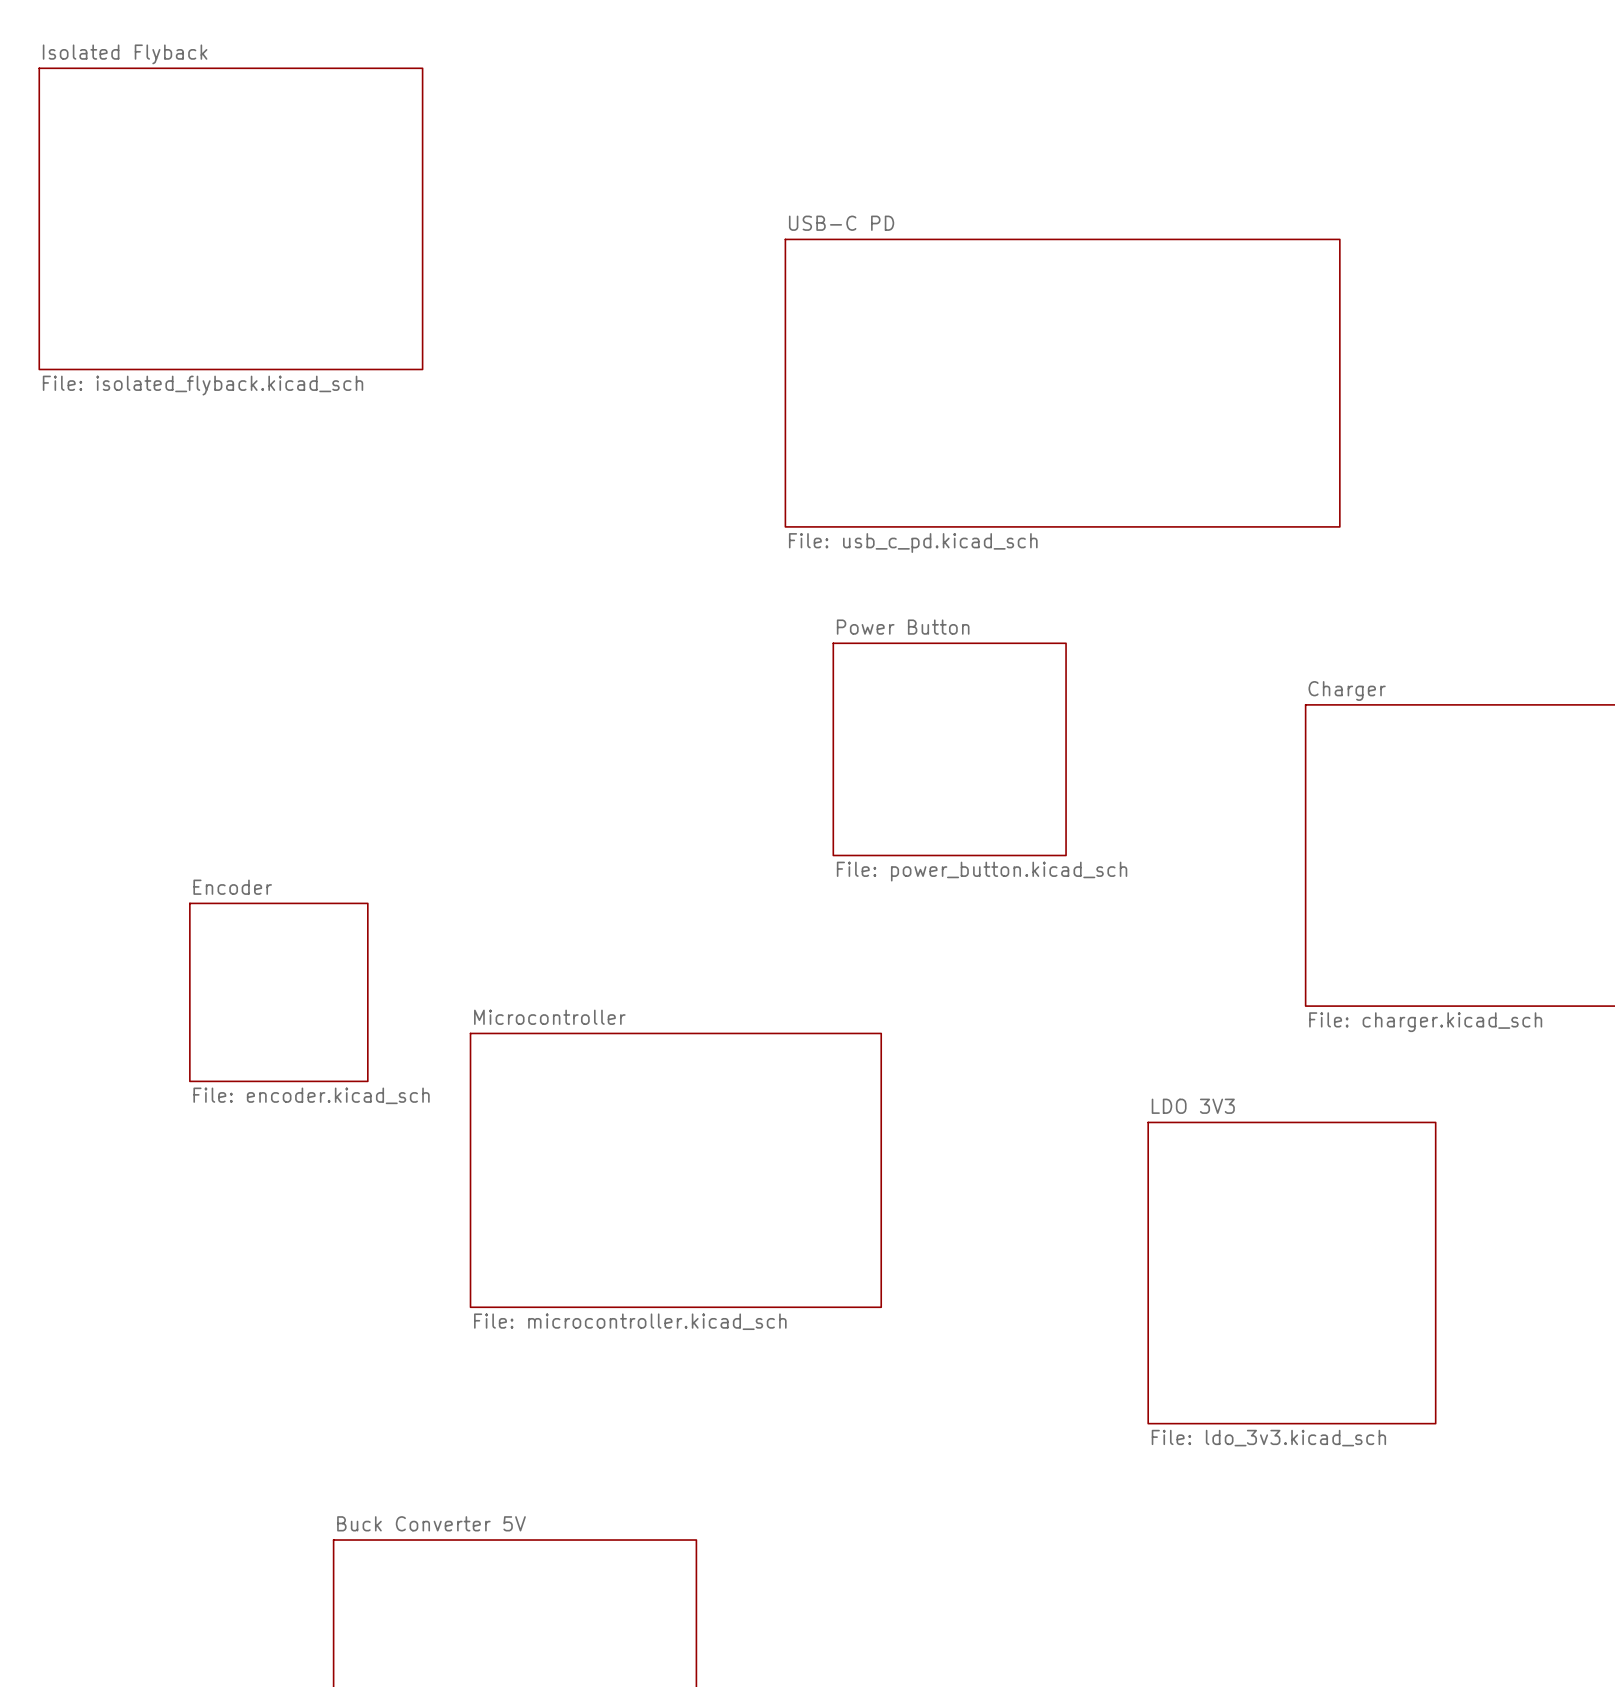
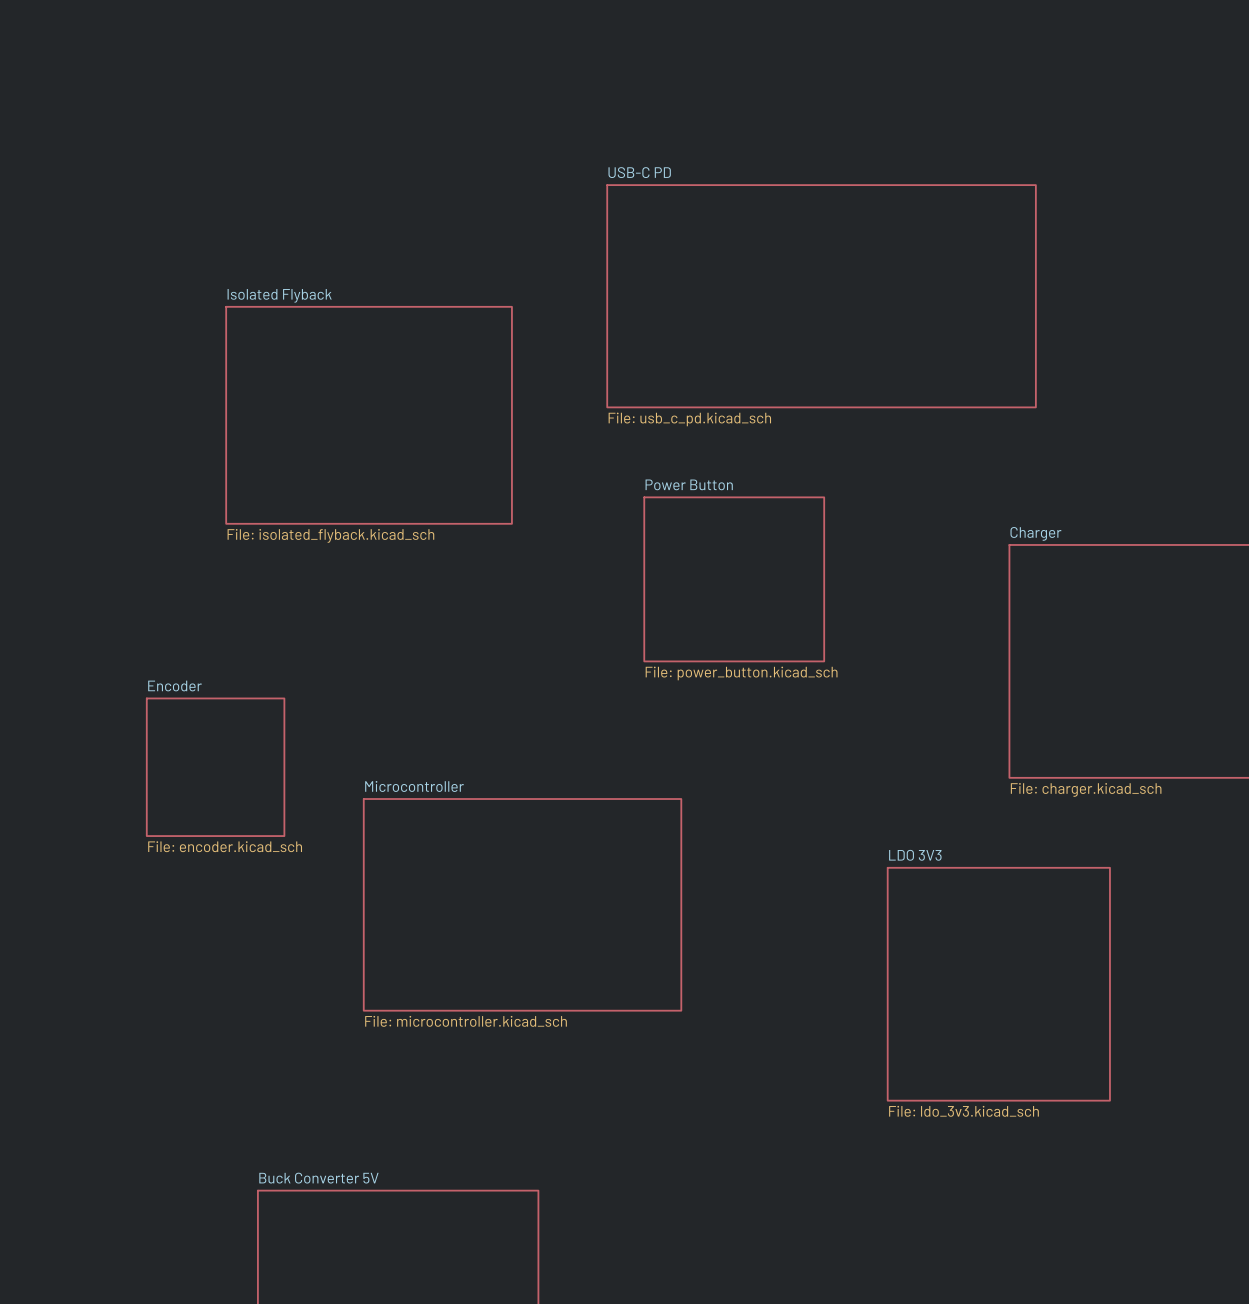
sheet Isolated Flyback: File: isolated_flyback.kicad_sch (230, 218) -> none
sheet Isolated Flyback: none -> File: isolated_flyback.kicad_sch (369, 415)

